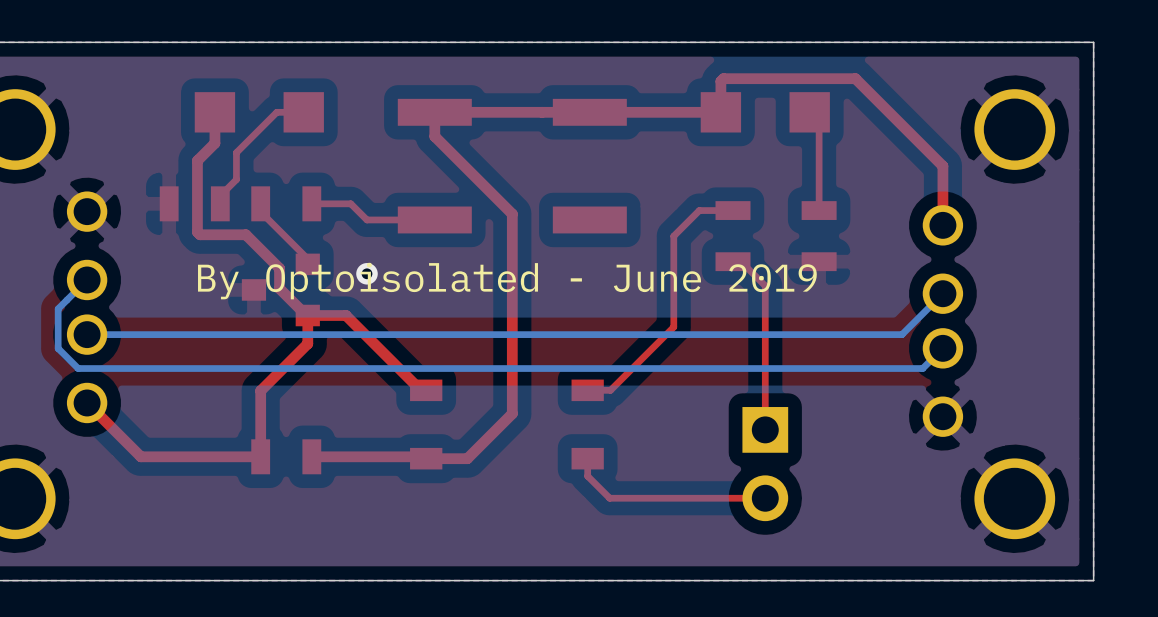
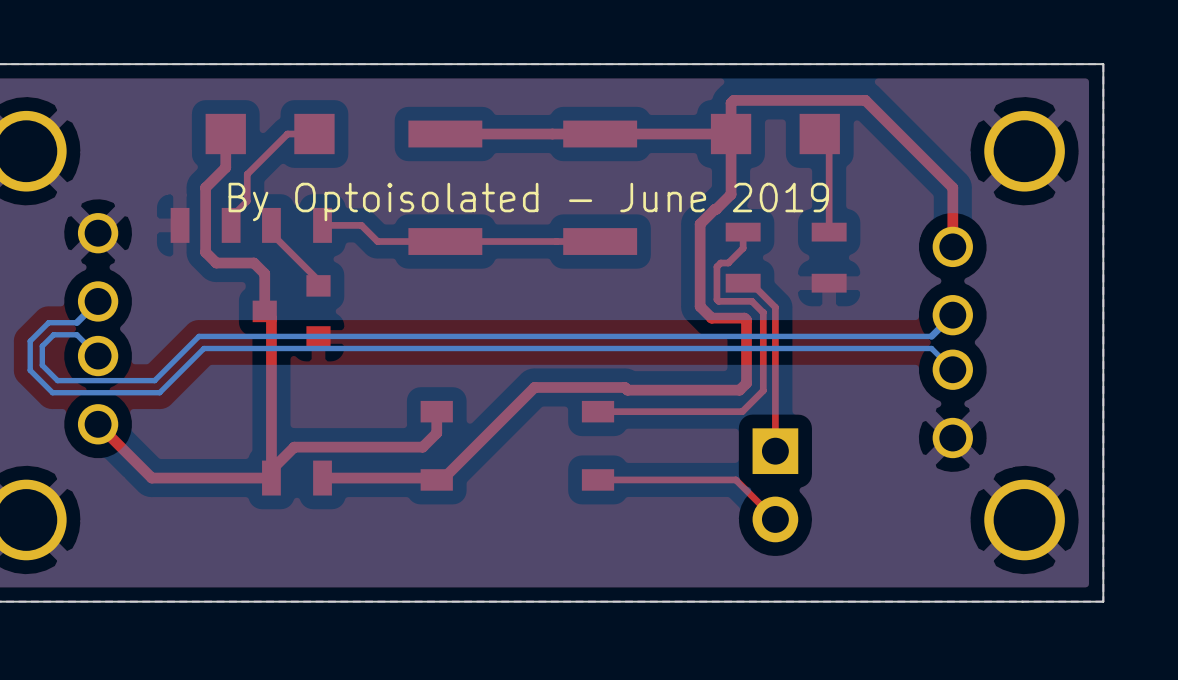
top track: (434, 112) (434, 136) (512, 214) (512, 413) (467, 458) (431, 458) -> (731, 134) (731, 194) (700, 224) (700, 306) (711, 318) (744, 318) (746, 320) (746, 383) (739, 390) (534, 387) (442, 479)
top track: (214, 143) (197, 160) (197, 232) (200, 234) (245, 234) (279, 268) (279, 288) (306, 315) (346, 315) (420, 390) (426, 390) -> (225, 164) (225, 167) (205, 187) (205, 252) (216, 263) (253, 263) (264, 273) (264, 311) (271, 318) (271, 412)
top track: (733, 210) (699, 210) (673, 236) (673, 327) (610, 390) -> (763, 312) (763, 390) (742, 411) (620, 411)
top track: none -> (743, 232) (743, 248) (728, 263) (720, 263) (716, 266) (716, 299) (718, 301) (751, 301) (762, 312)
top track: none -> (600, 241) (445, 241)
via: (366, 273) -> none
text position: By Optoisolated - June 2019 (507, 281) -> By Optoisolated - June 2019 (528, 202)
bottom track: (65, 301) (58, 308) (58, 348) (78, 368) (922, 368) (942, 348) -> (76, 322) (48, 322) (30, 341) (30, 370) (52, 392) (159, 392) (203, 348) (931, 348) (952, 369)
bottom track: (921, 314) (902, 334) (87, 334) -> (931, 336) (198, 336) (154, 380) (57, 380) (42, 365) (42, 346) (53, 334) (76, 334) (98, 356)
top track: (307, 315) (307, 343) (260, 390) -> none
top track: none -> (436, 411) (436, 433) (422, 447) (294, 447) (271, 469)
top track: (587, 458) (587, 476) (609, 498) (765, 498) -> (598, 479) (735, 479) (775, 519)

